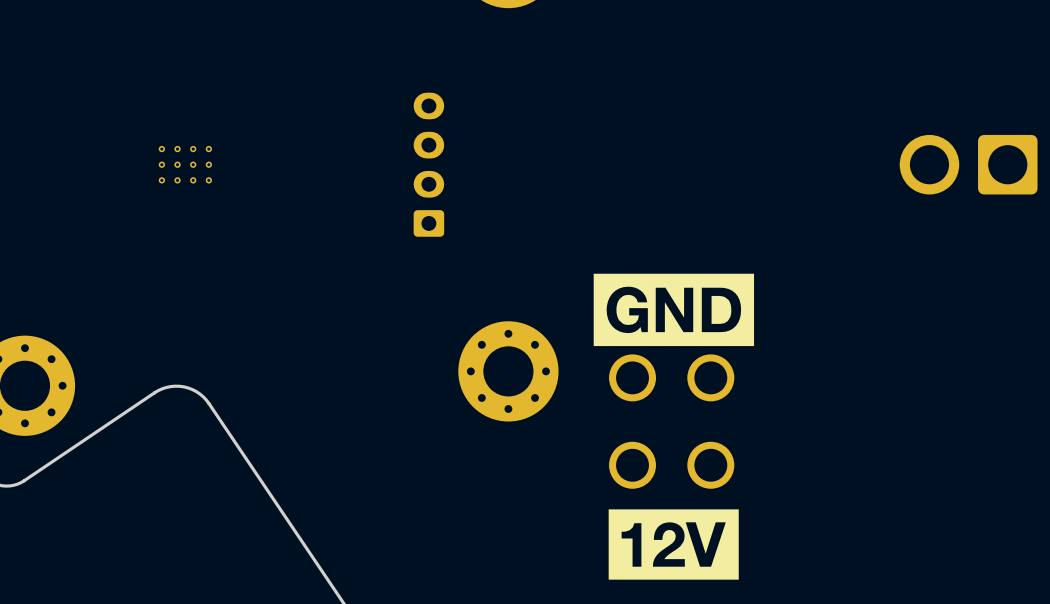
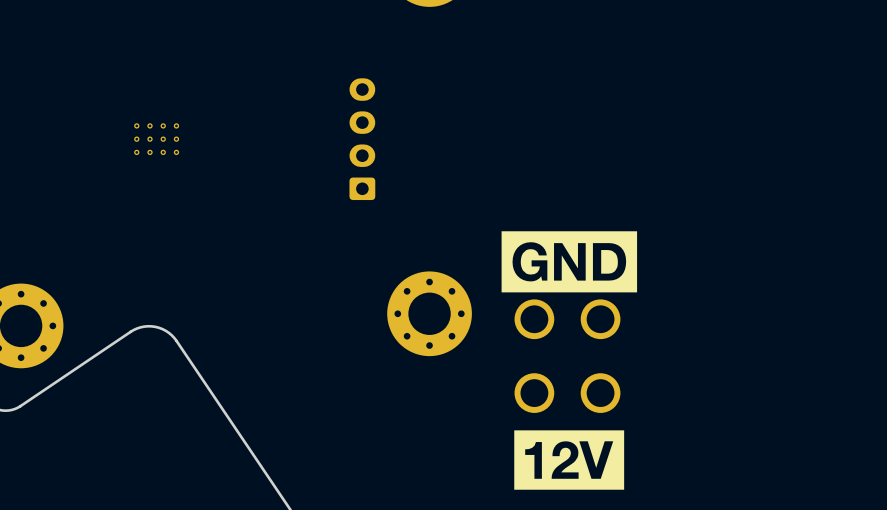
part: (968, 164) -> none

